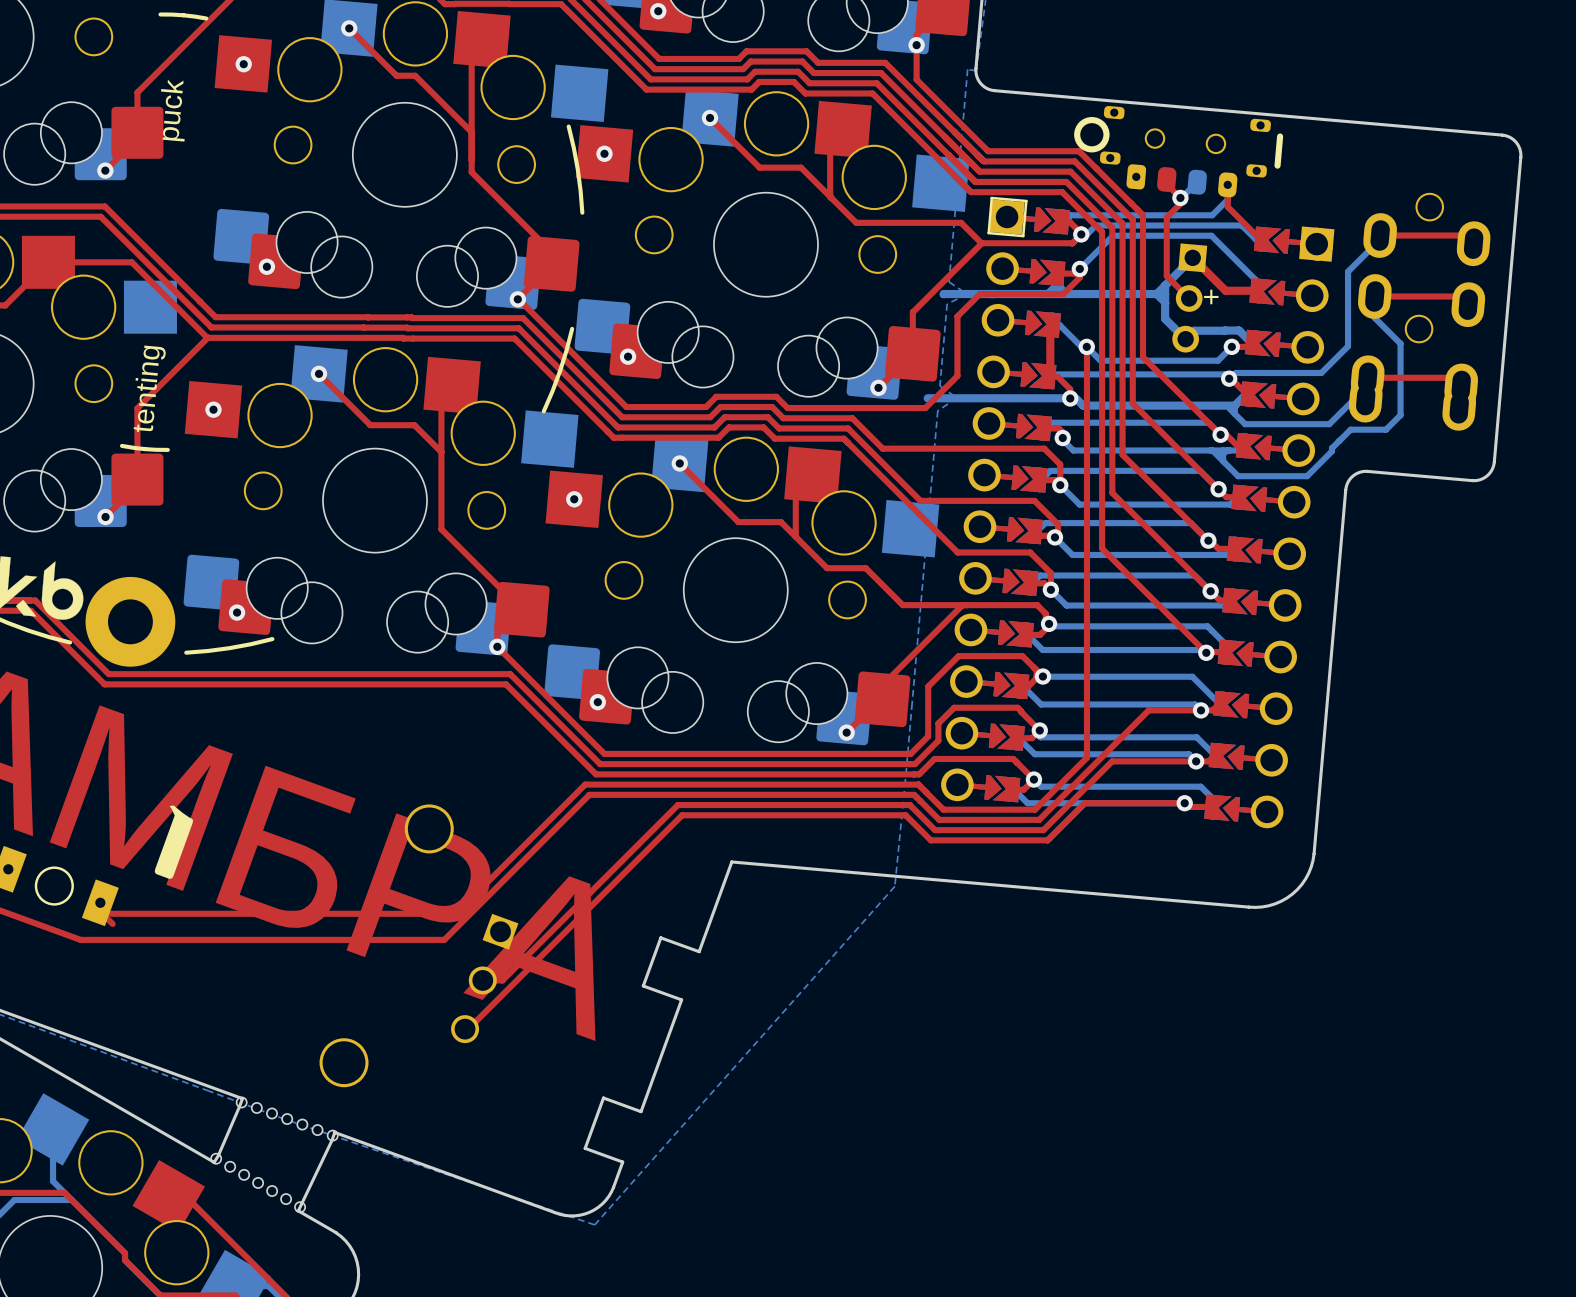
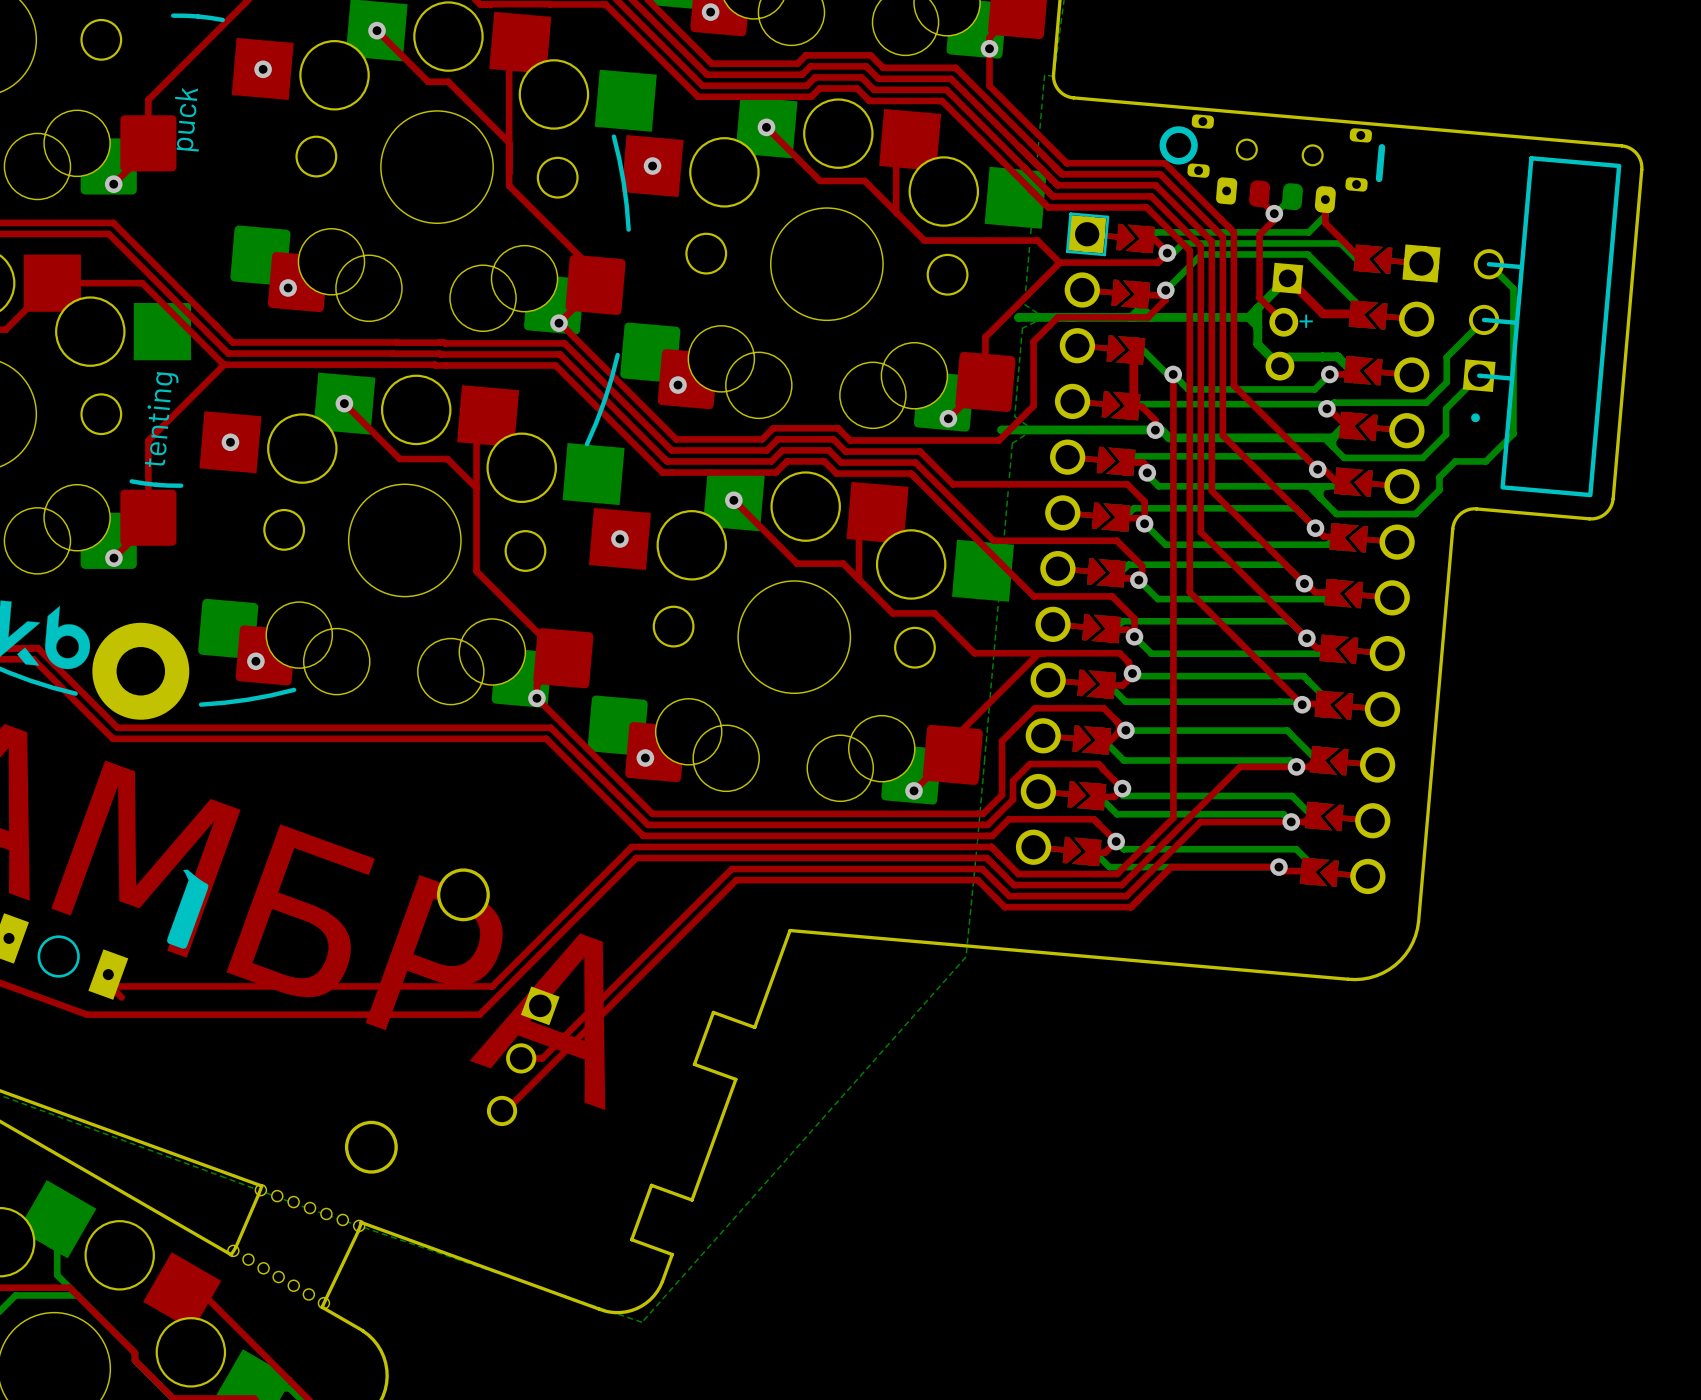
part footprint: [1348, 192, 1491, 431] -> [1462, 156, 1622, 498]
top track: (1380, 235) (1465, 235) -> none
bottom track: (1380, 239) (1348, 271) (1348, 346) (1340, 354) -> (1484, 319) (1446, 357) (1446, 382)
top track: (1374, 296) (1460, 296) -> none
bottom track: (1374, 296) (1374, 317) (1400, 343) (1400, 415) (1386, 429) (1350, 429) (1307, 476) -> (1488, 264) (1513, 288) (1513, 433) (1485, 461) (1455, 461) (1439, 477) (1439, 490) (1415, 514) (1411, 514)
top track: (1367, 377) (1453, 377) -> none
bottom track: (1353, 400) (1329, 424) (1317, 424) -> (1479, 375) (1446, 408) (1446, 434) (1422, 457)

